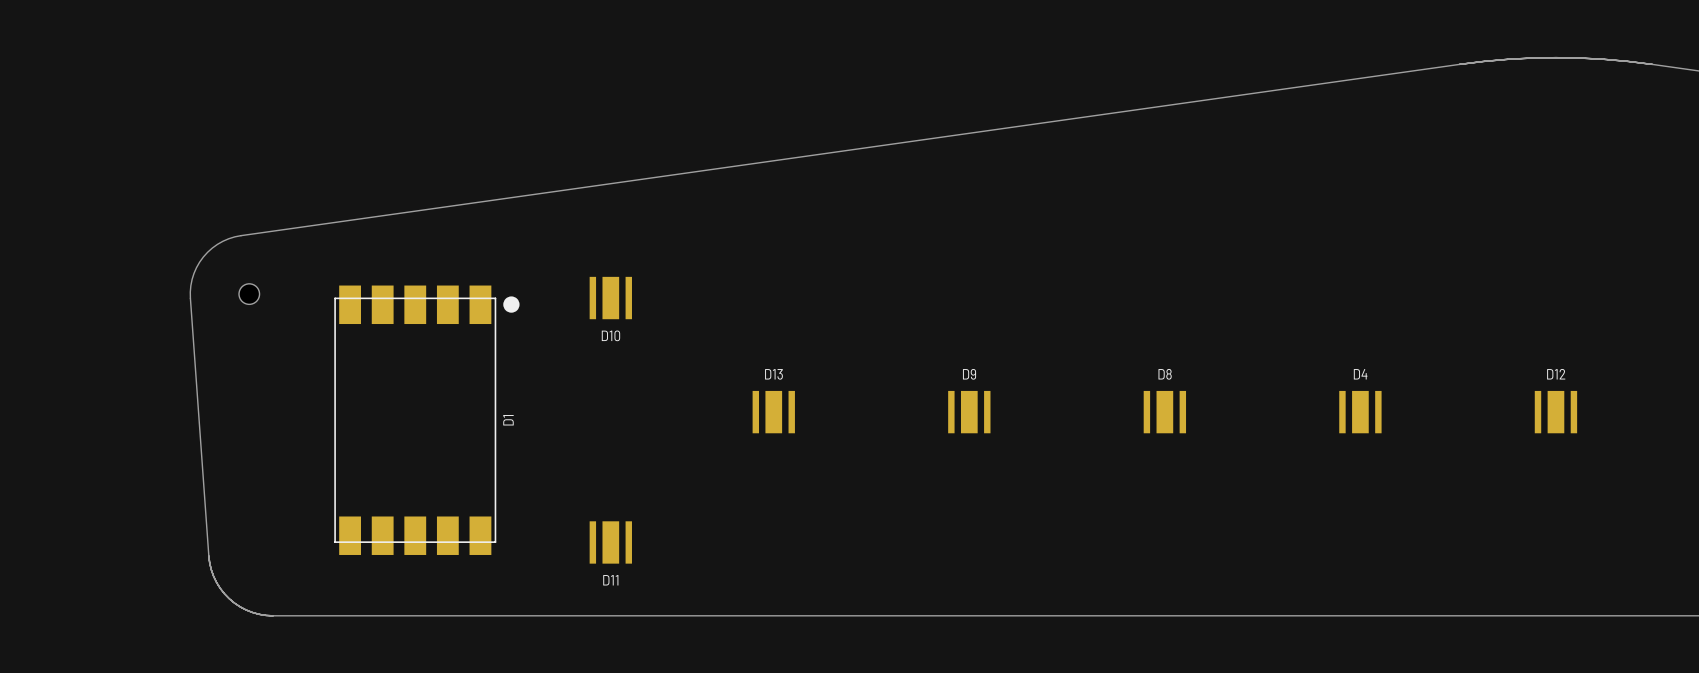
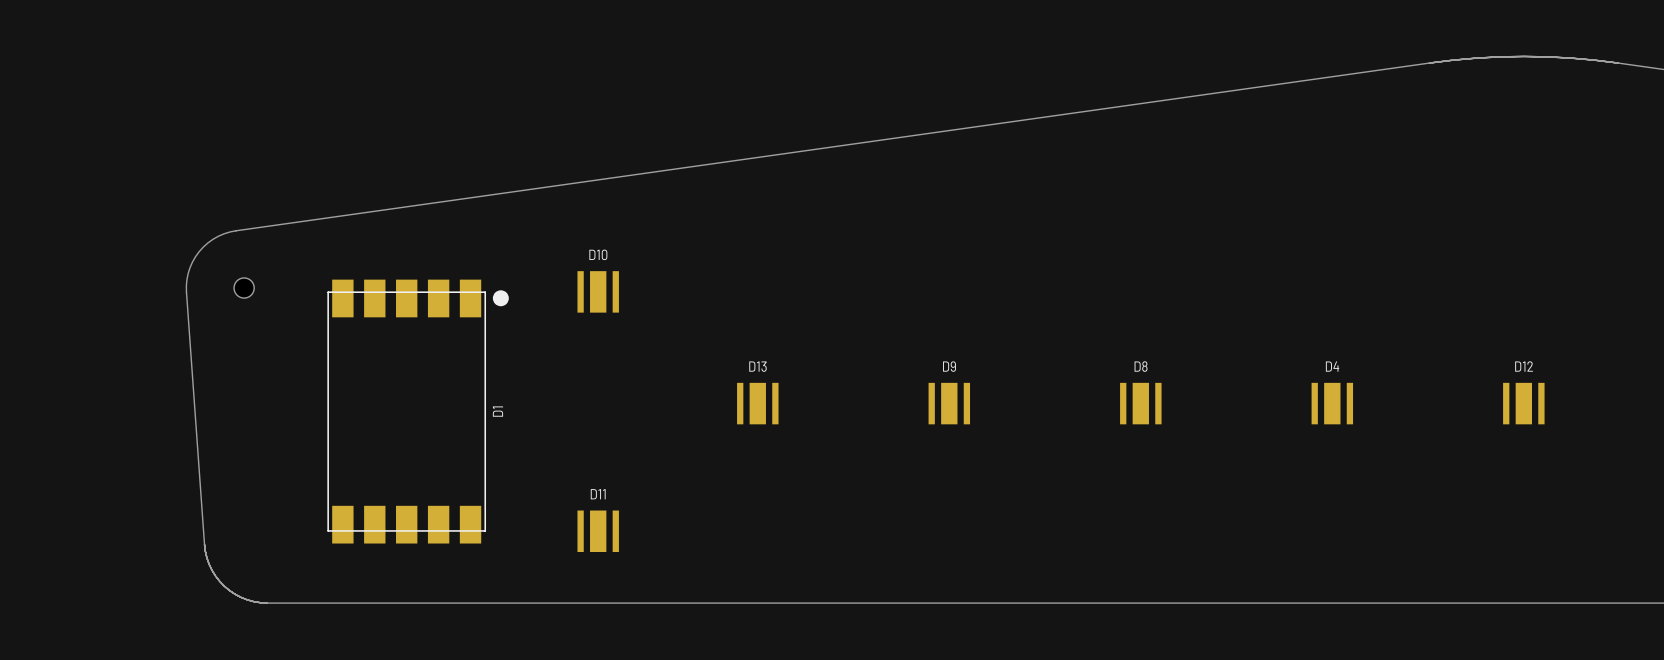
D10 name position: D10 (610, 335) -> D10 (598, 254)
D11 name position: D11 (610, 580) -> D11 (598, 494)

